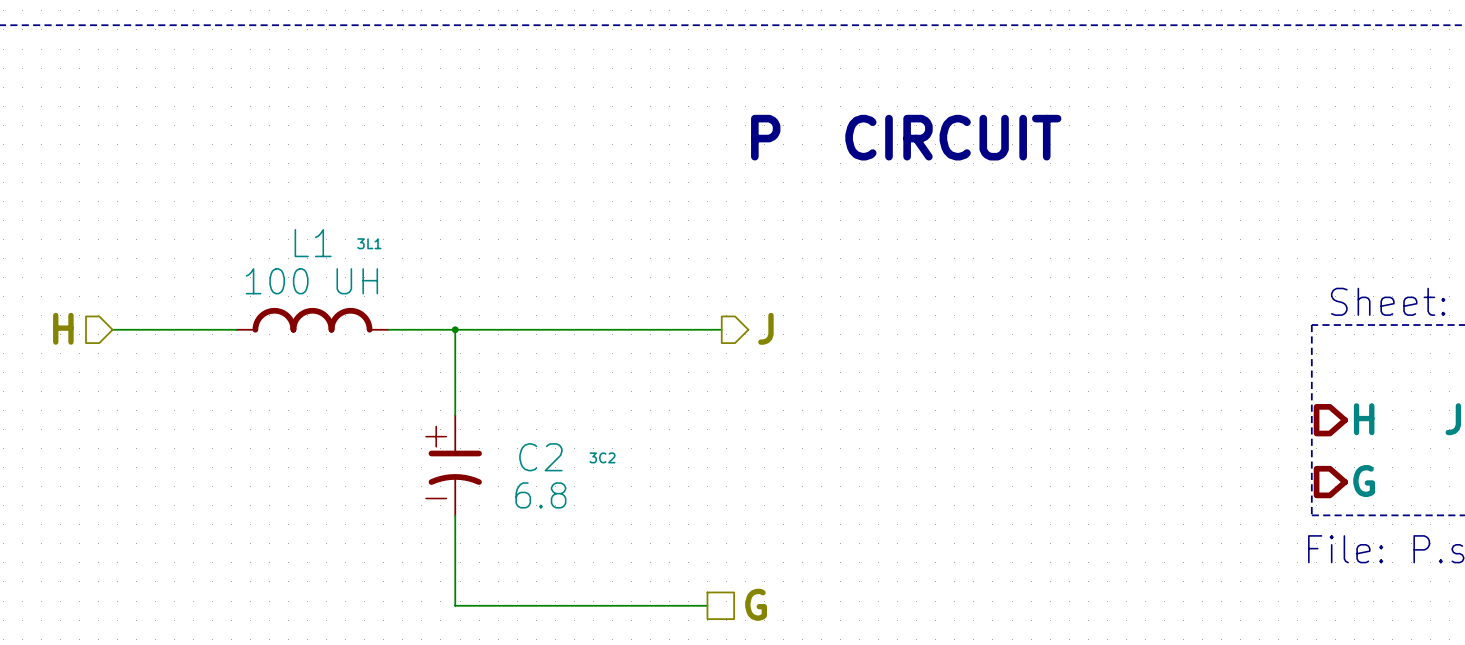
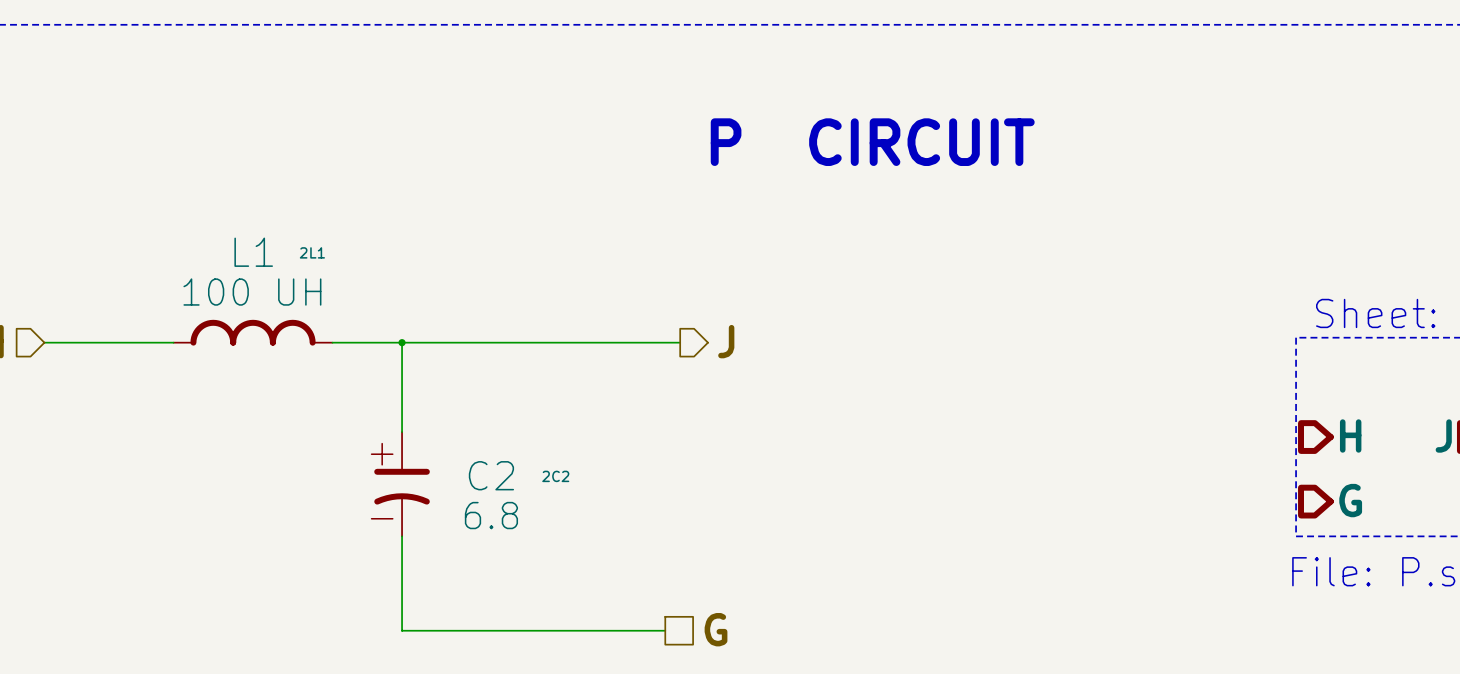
3L1 name: 3L1 (369, 243) -> 2L1 (312, 252)
3C2 name: 3C2 (602, 457) -> 2C2 (555, 476)

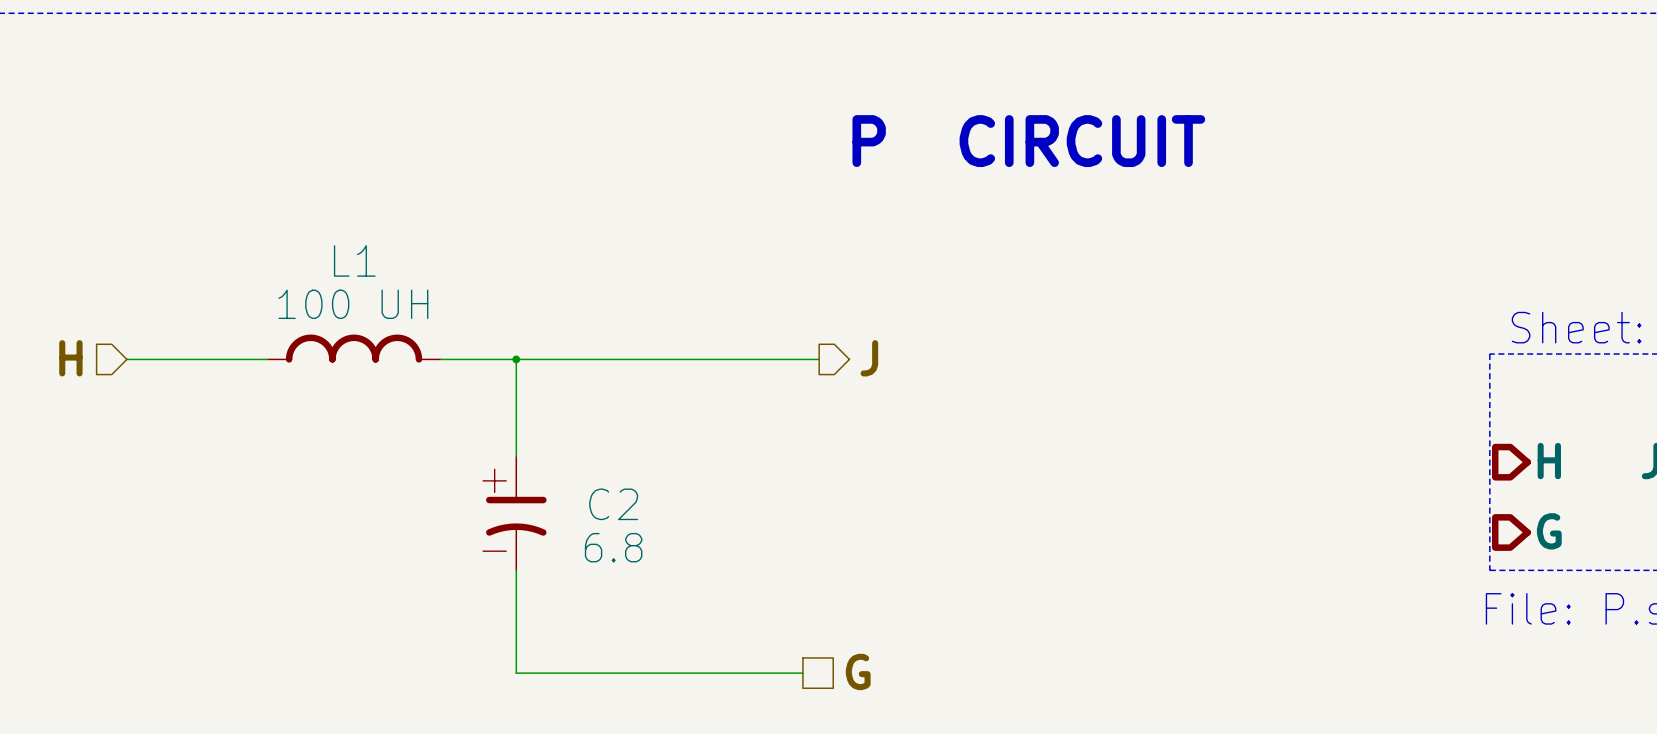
2L1 name: 2L1 (312, 252) -> none
2C2 name: 2C2 (555, 476) -> none

